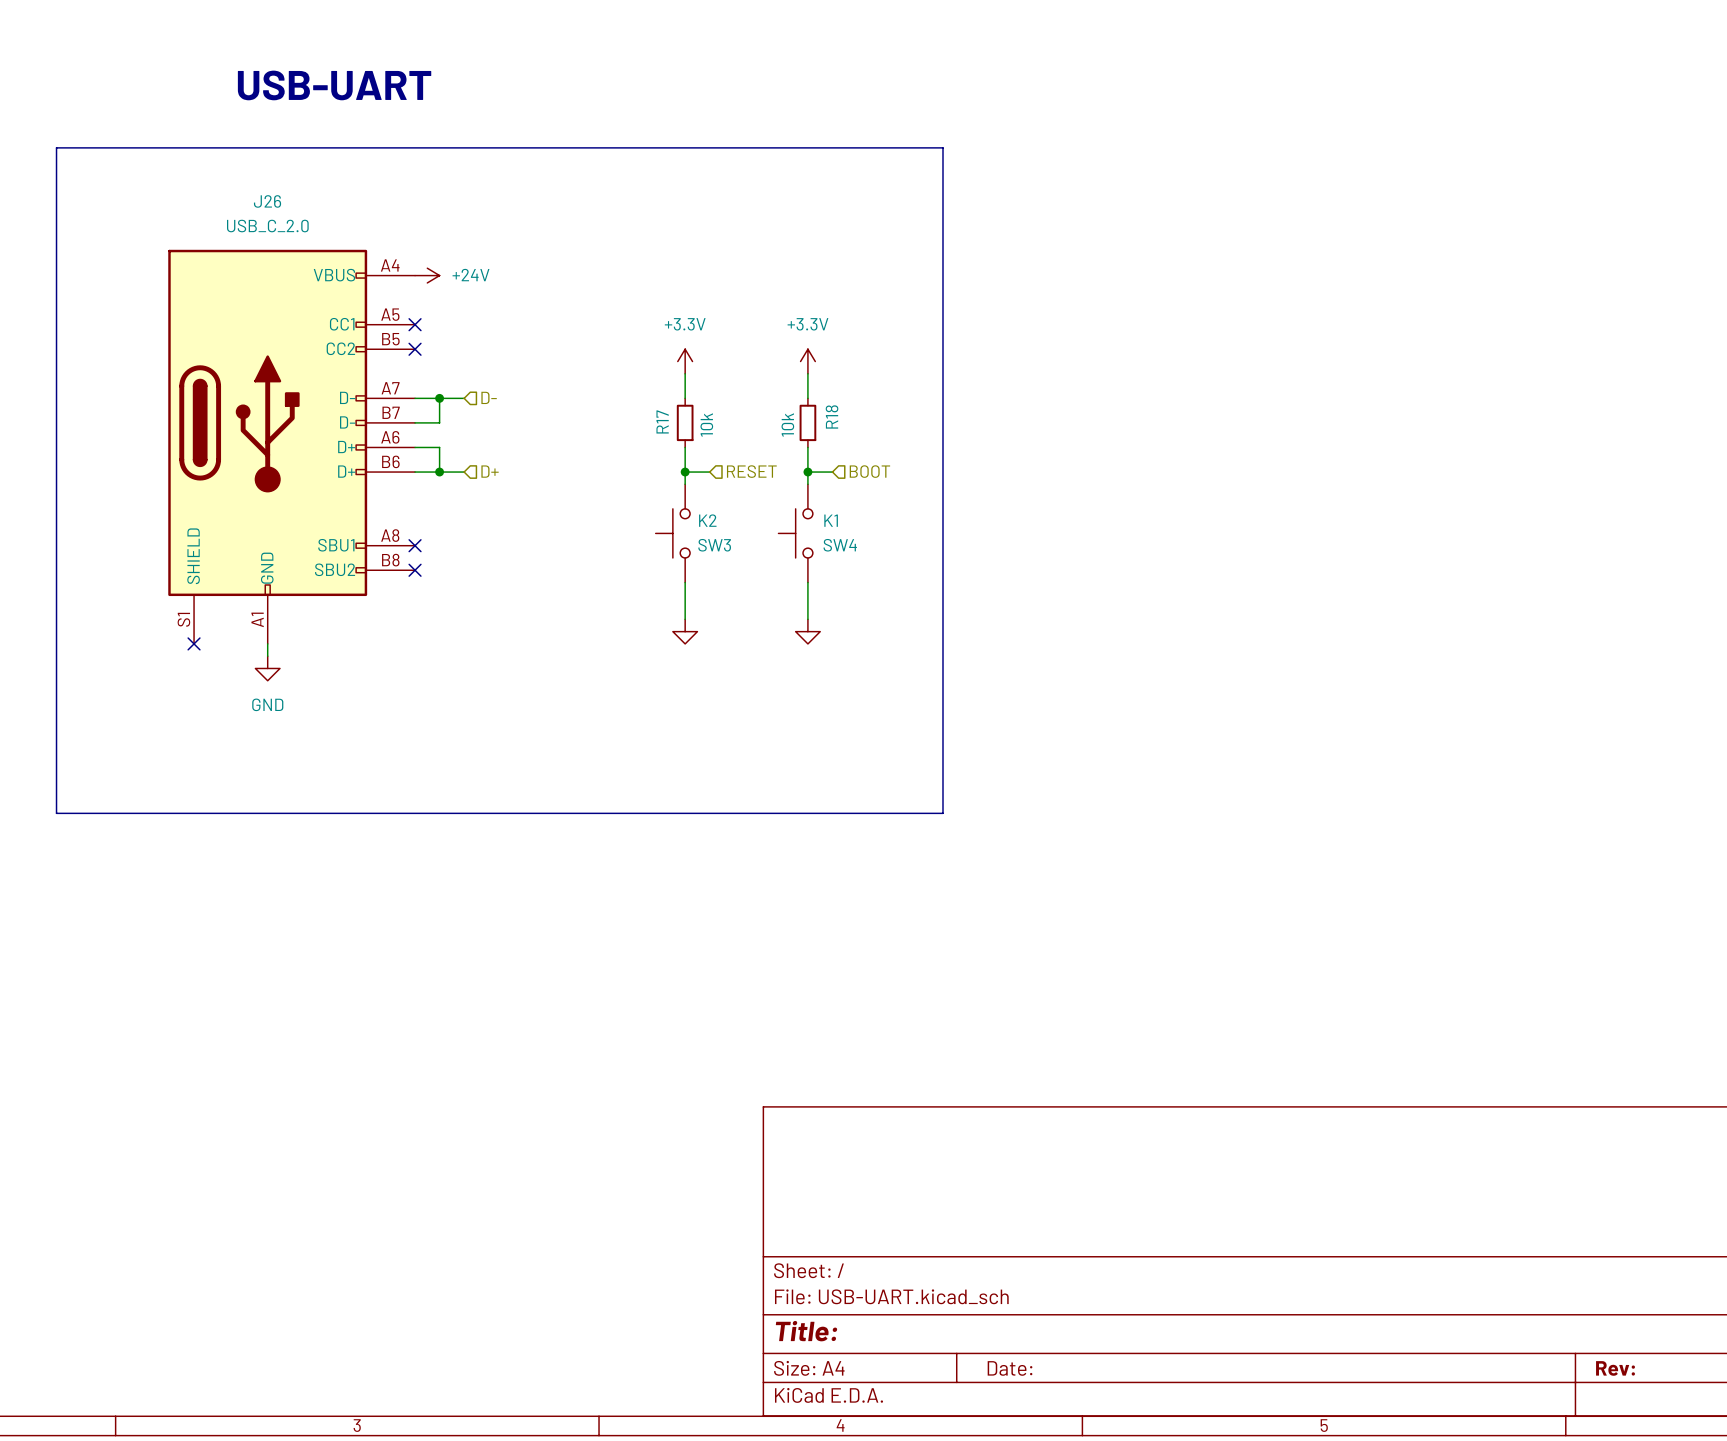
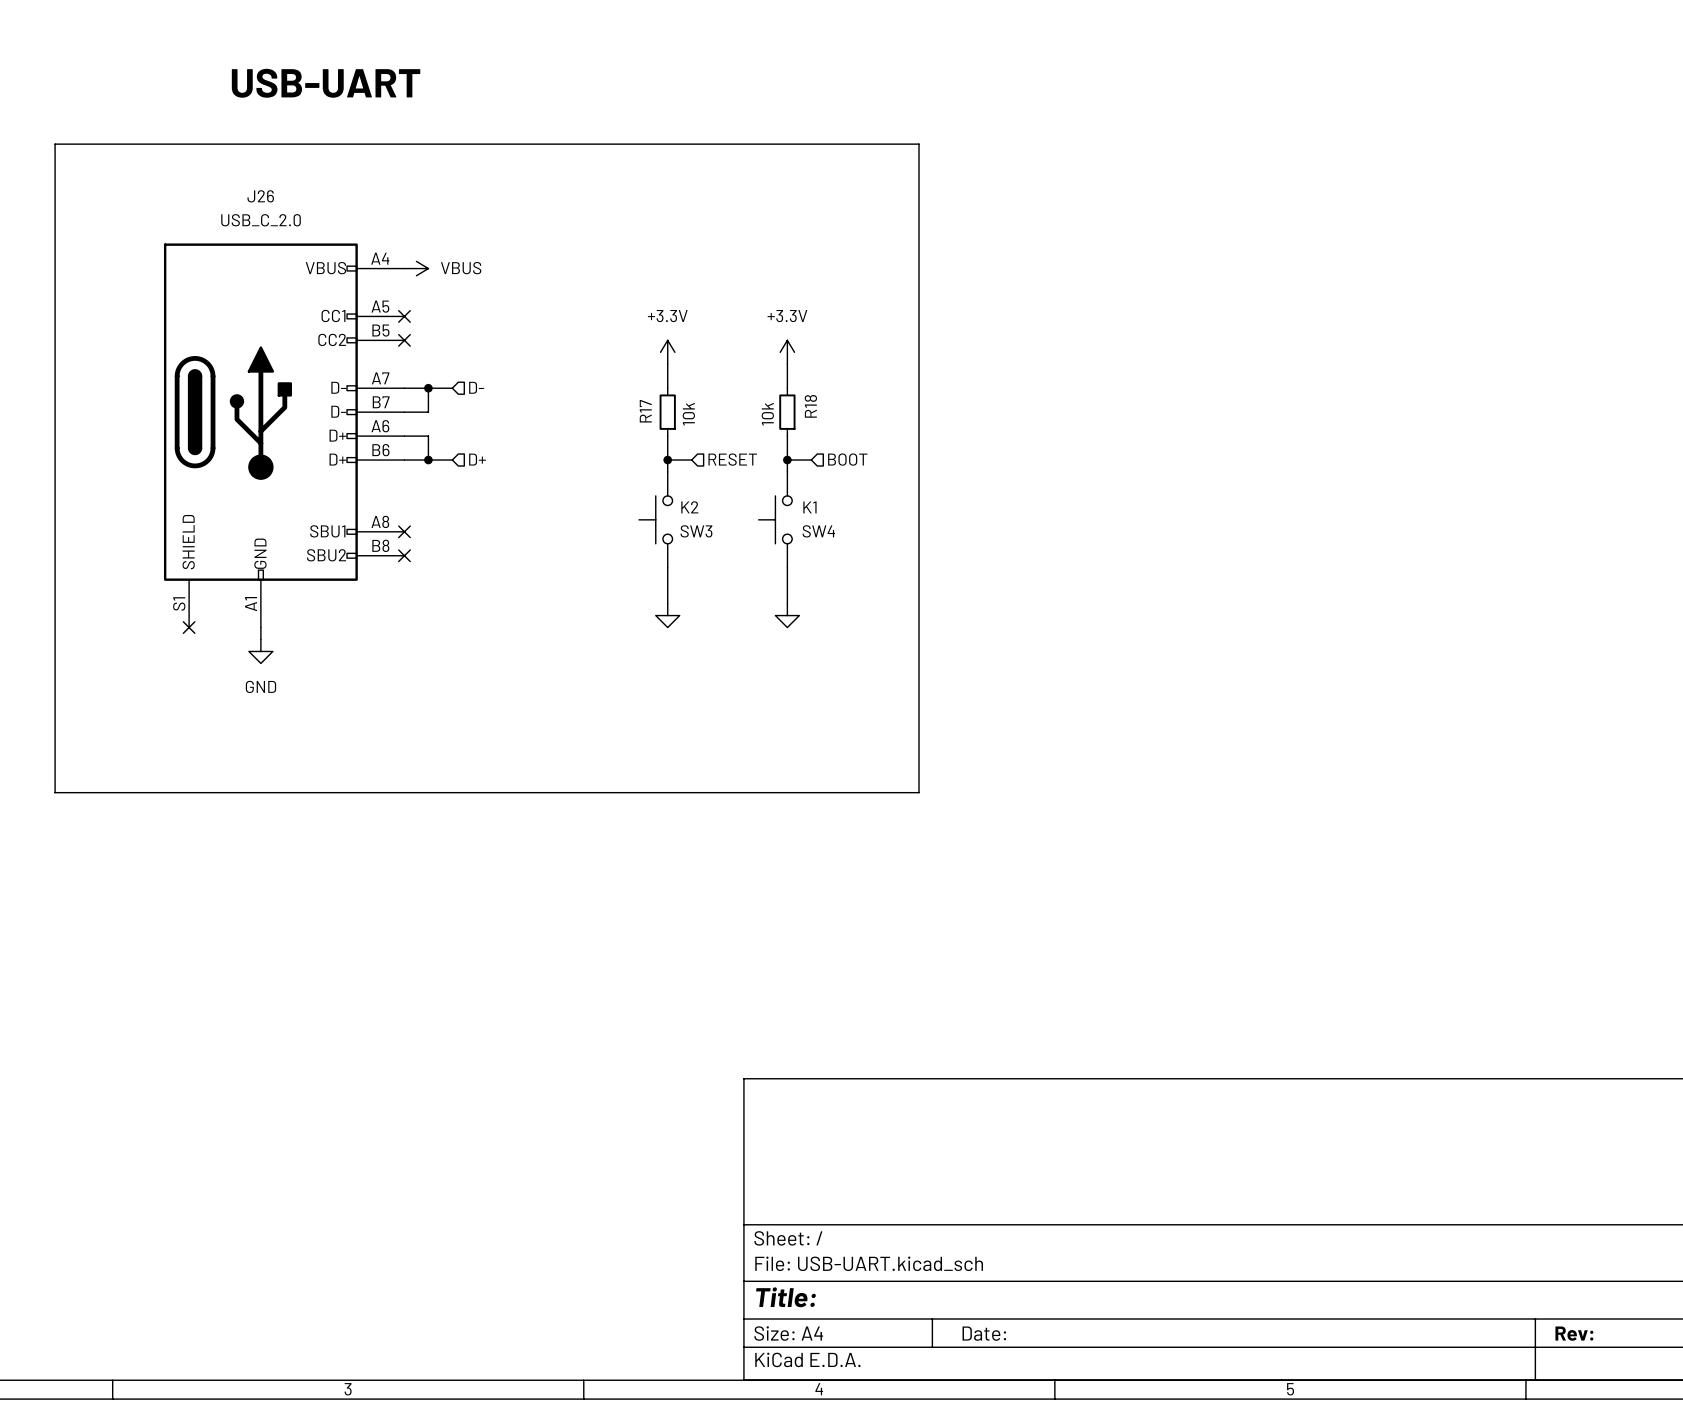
power symbol: +24V (427, 275) -> VBUS (416, 268)

